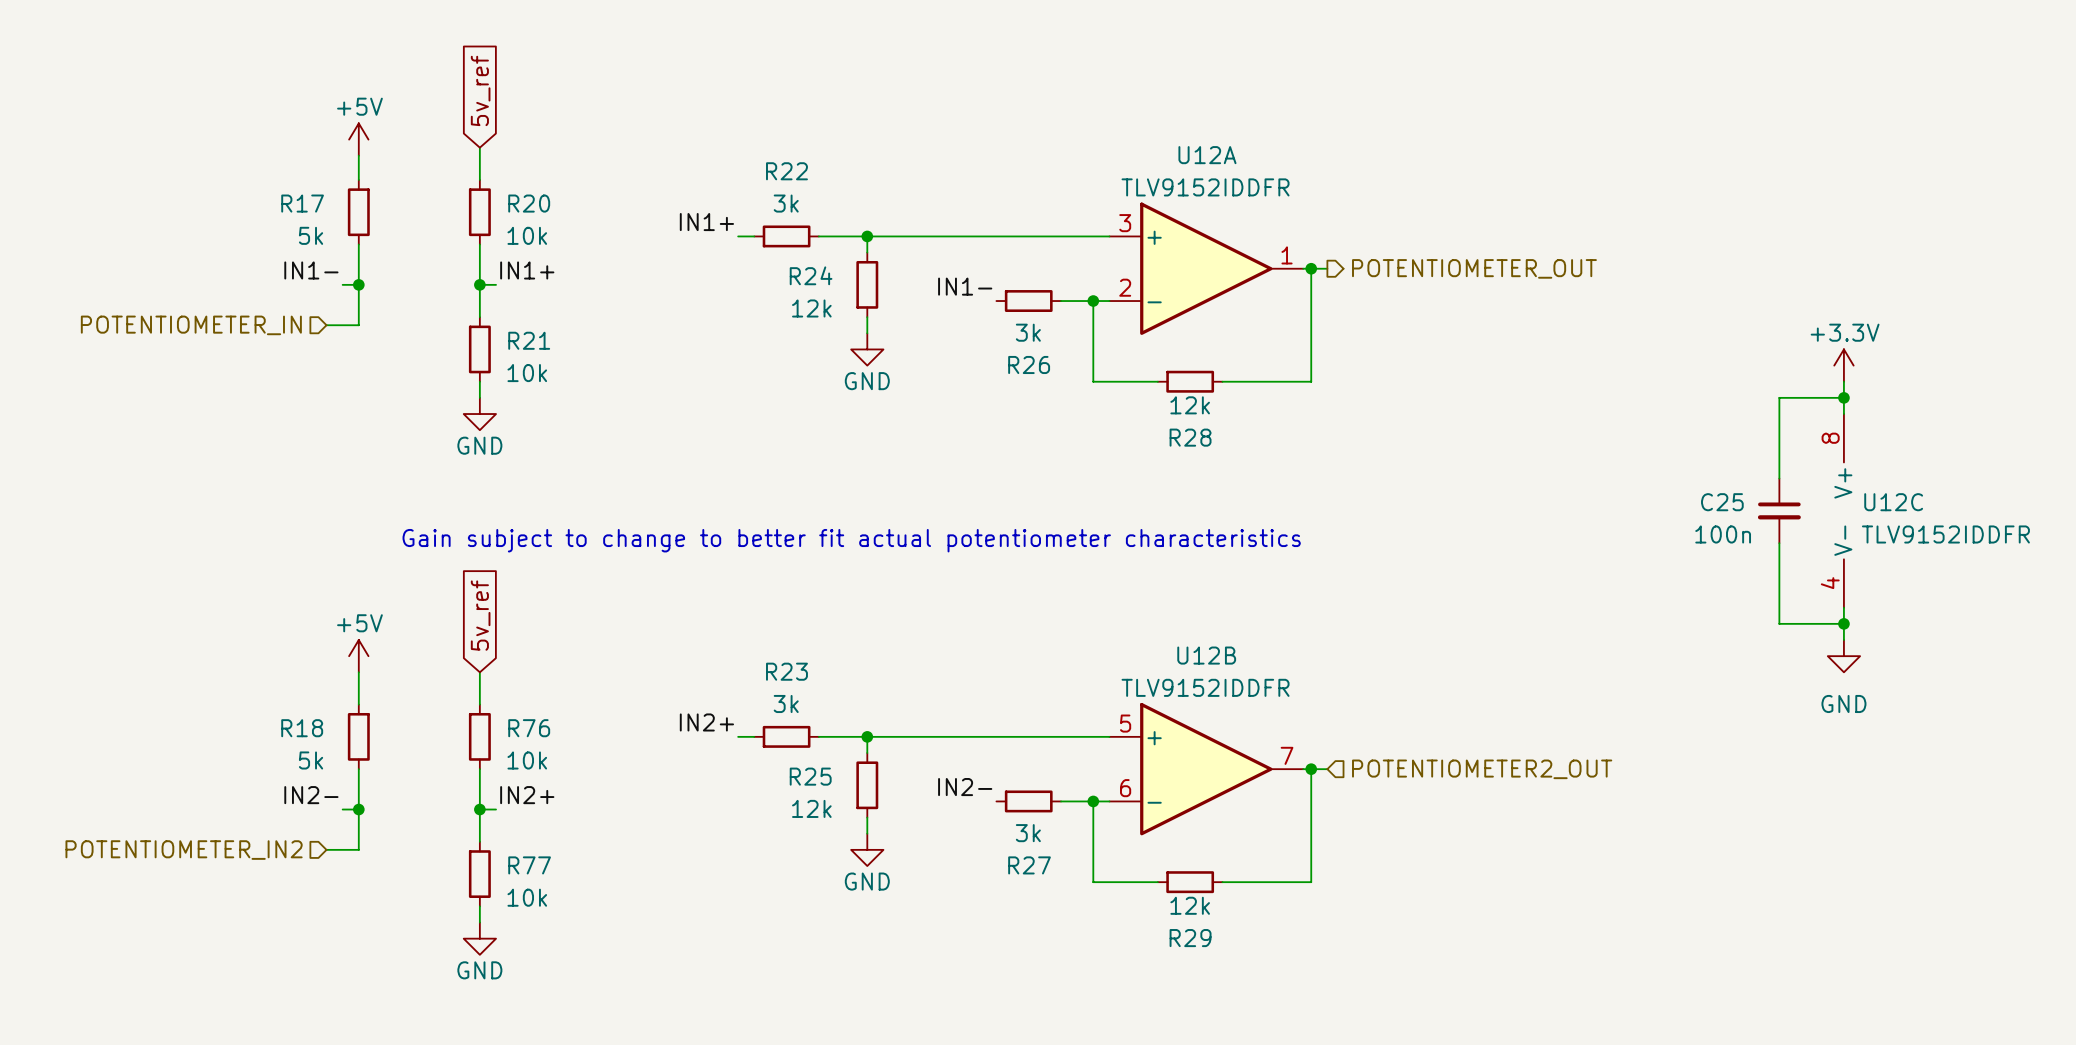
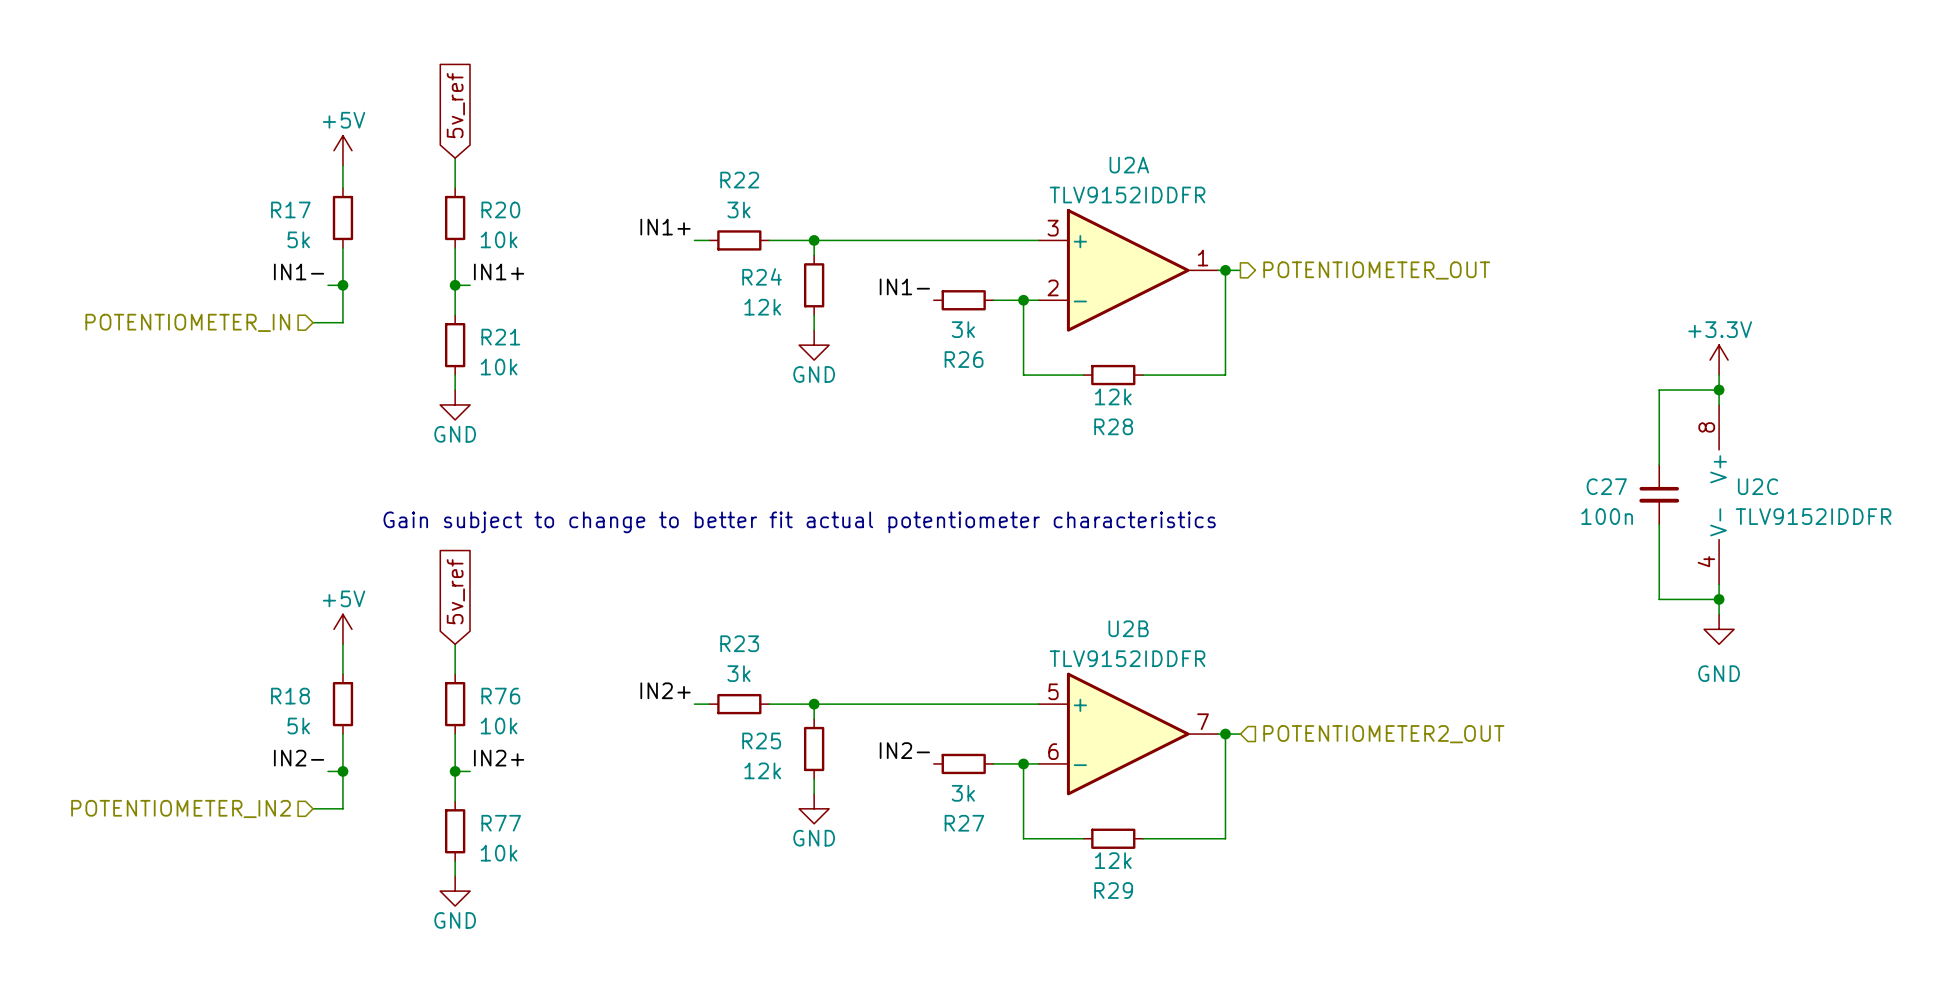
U12A name: U12A (1207, 155) -> U2A (1129, 165)
C25 name: C25 (1722, 502) -> C27 (1606, 486)
U12C name: U12C (1893, 502) -> U2C (1758, 486)
U12B name: U12B (1206, 655) -> U2B (1128, 628)

